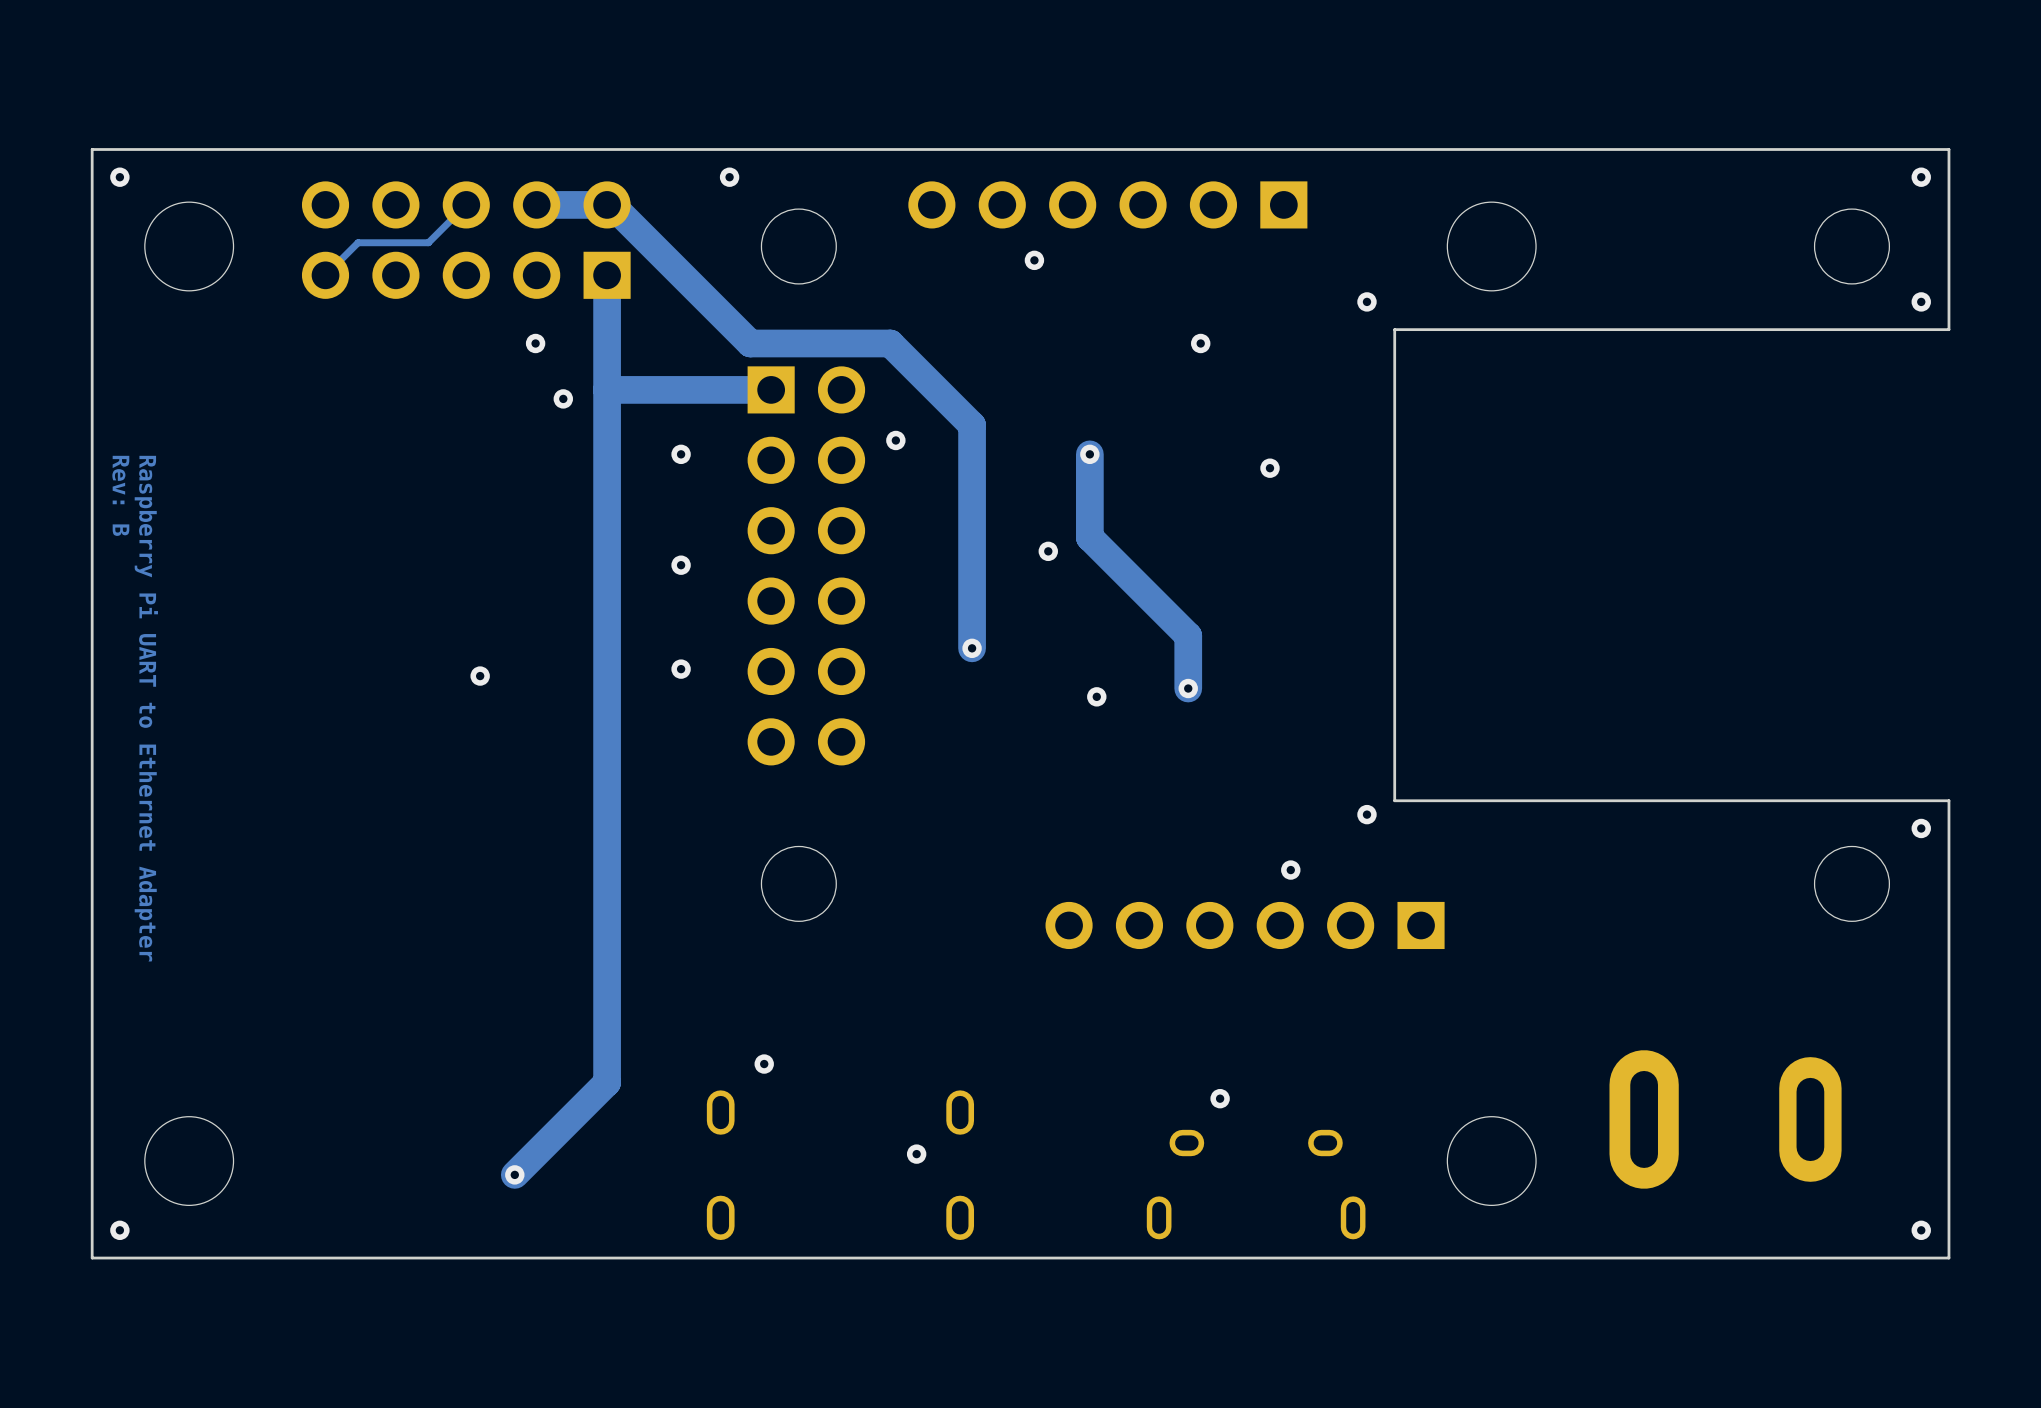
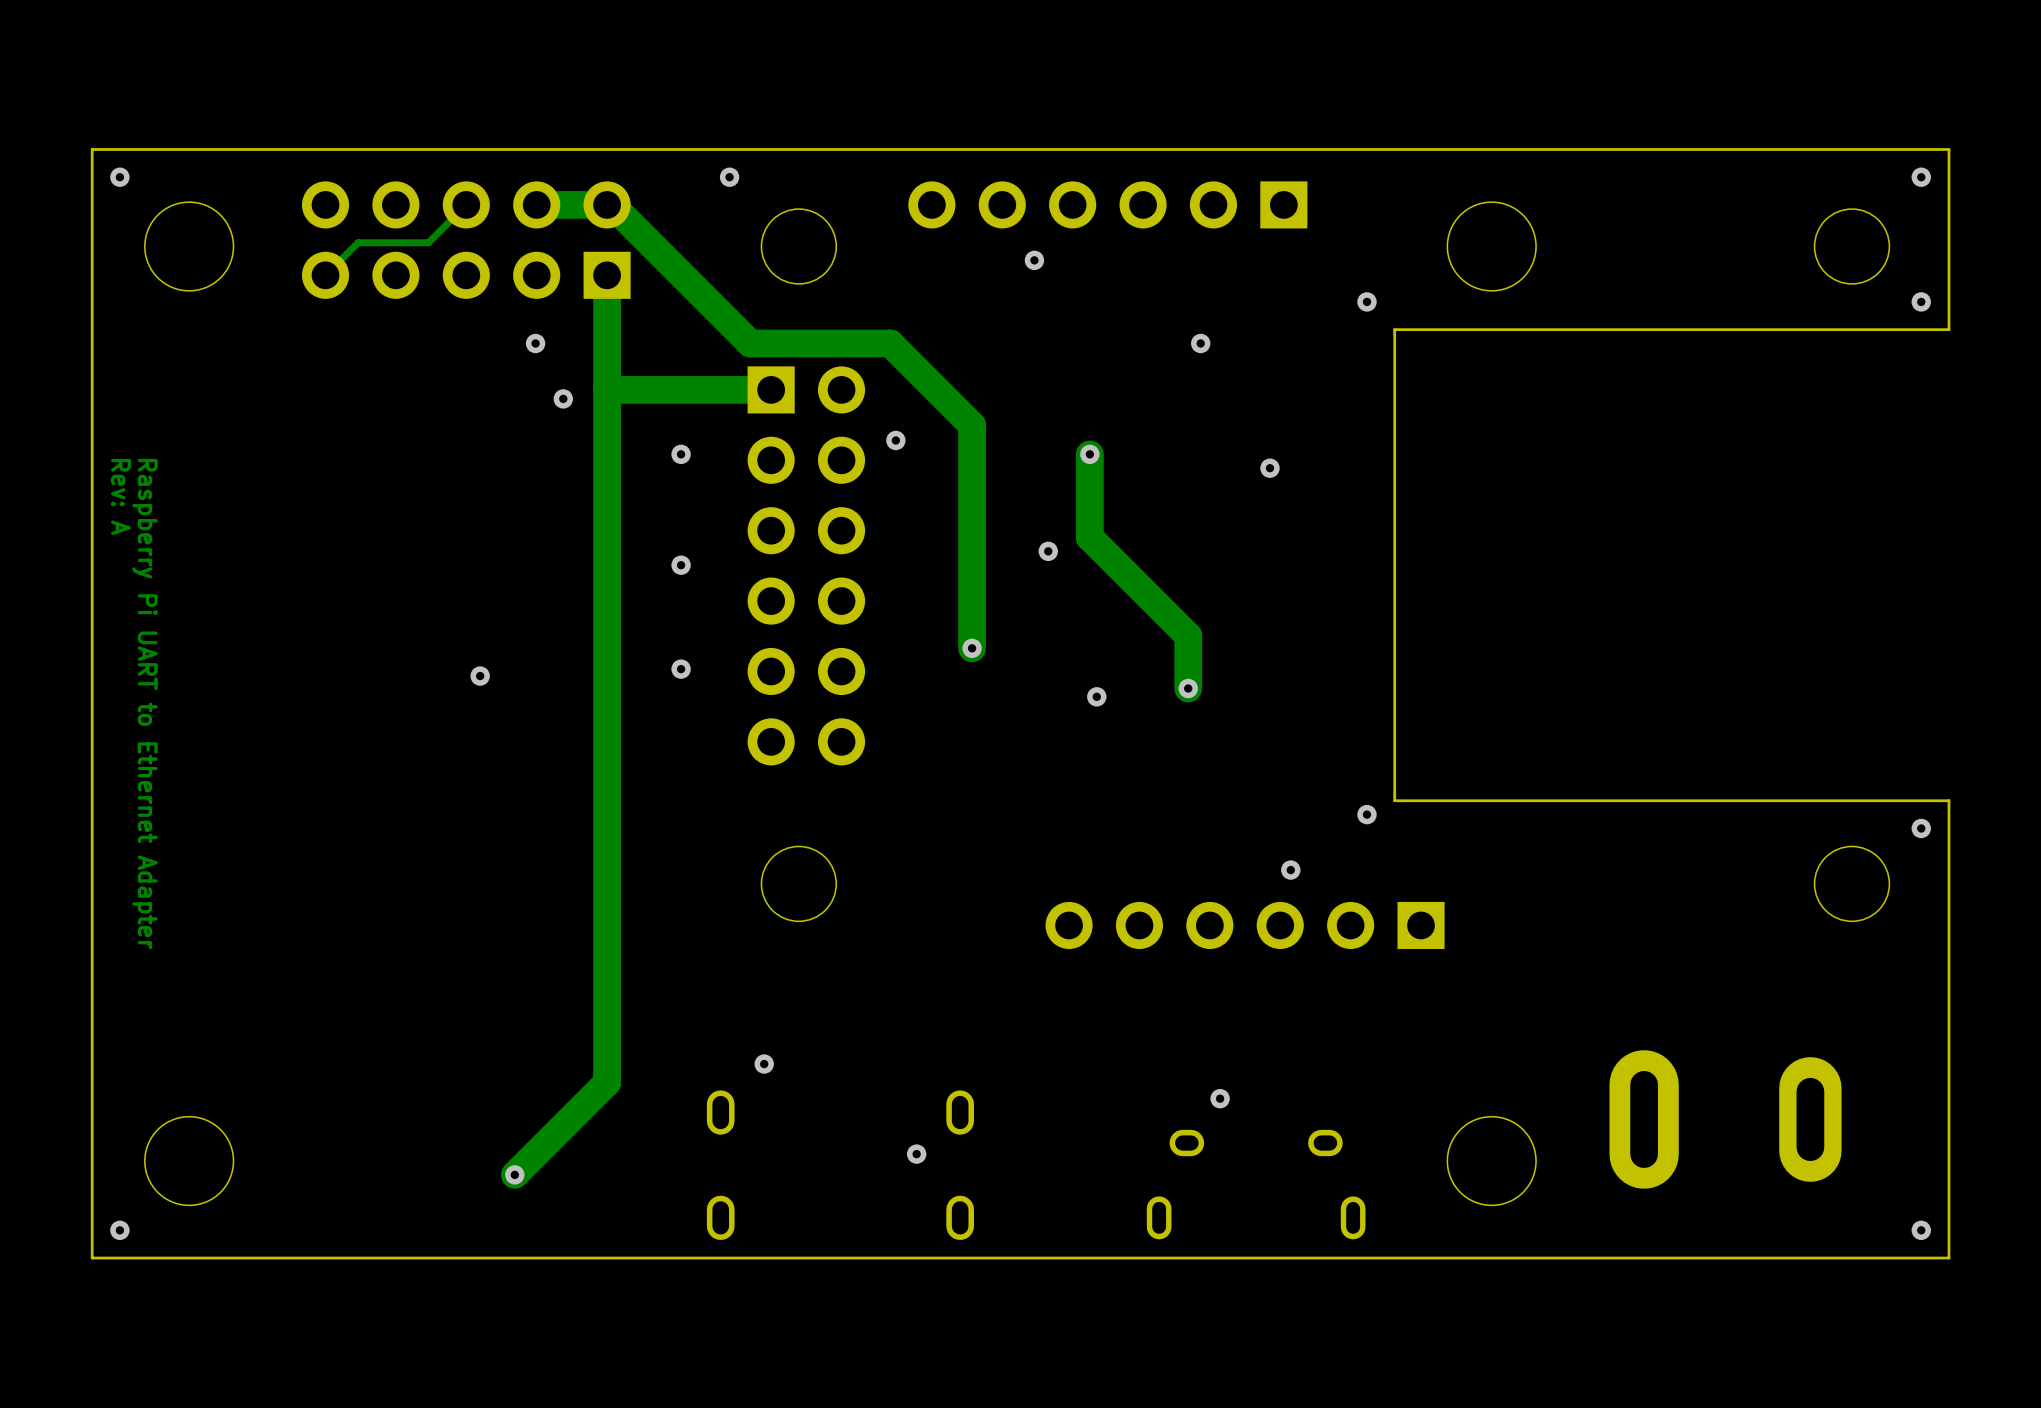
text: Rev: B (120, 495) -> Rev: A (120, 496)

